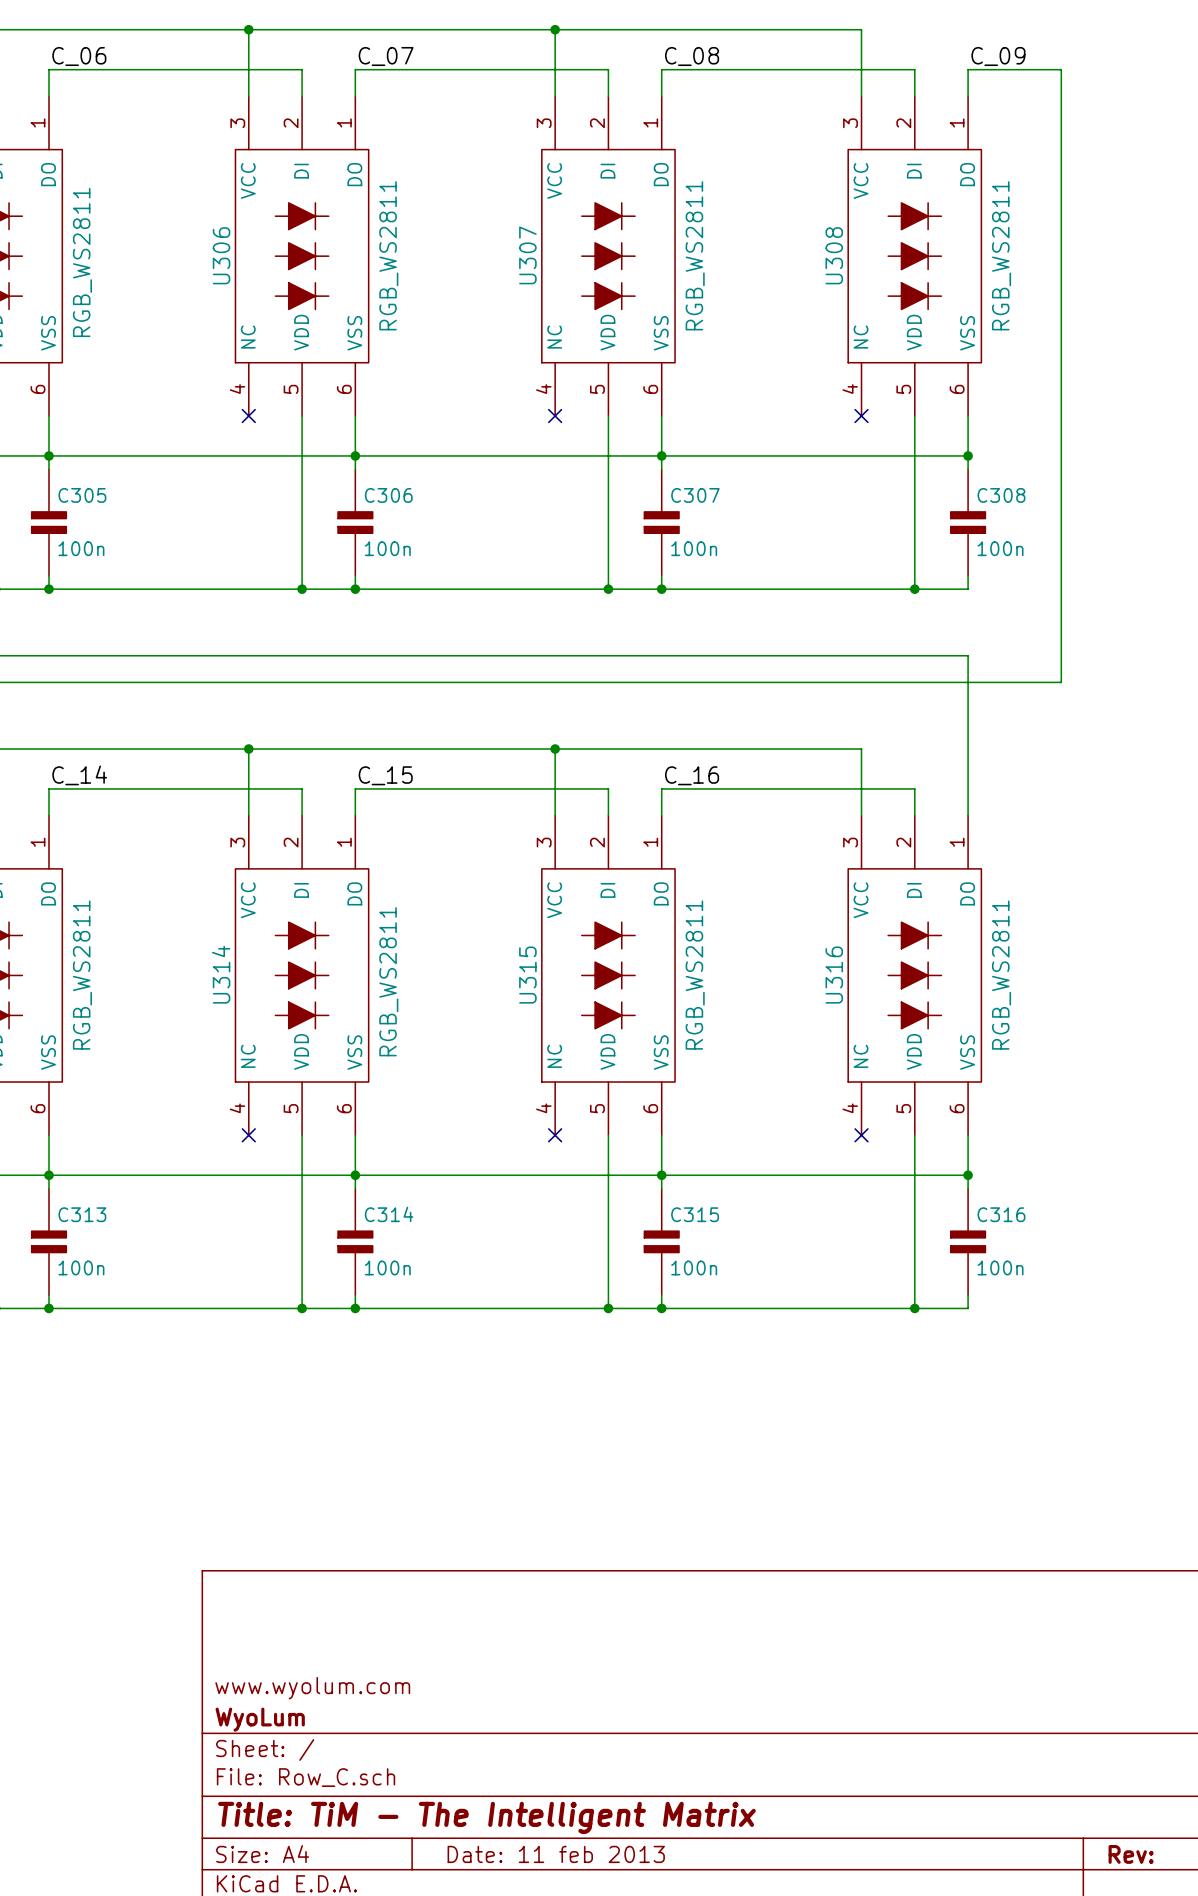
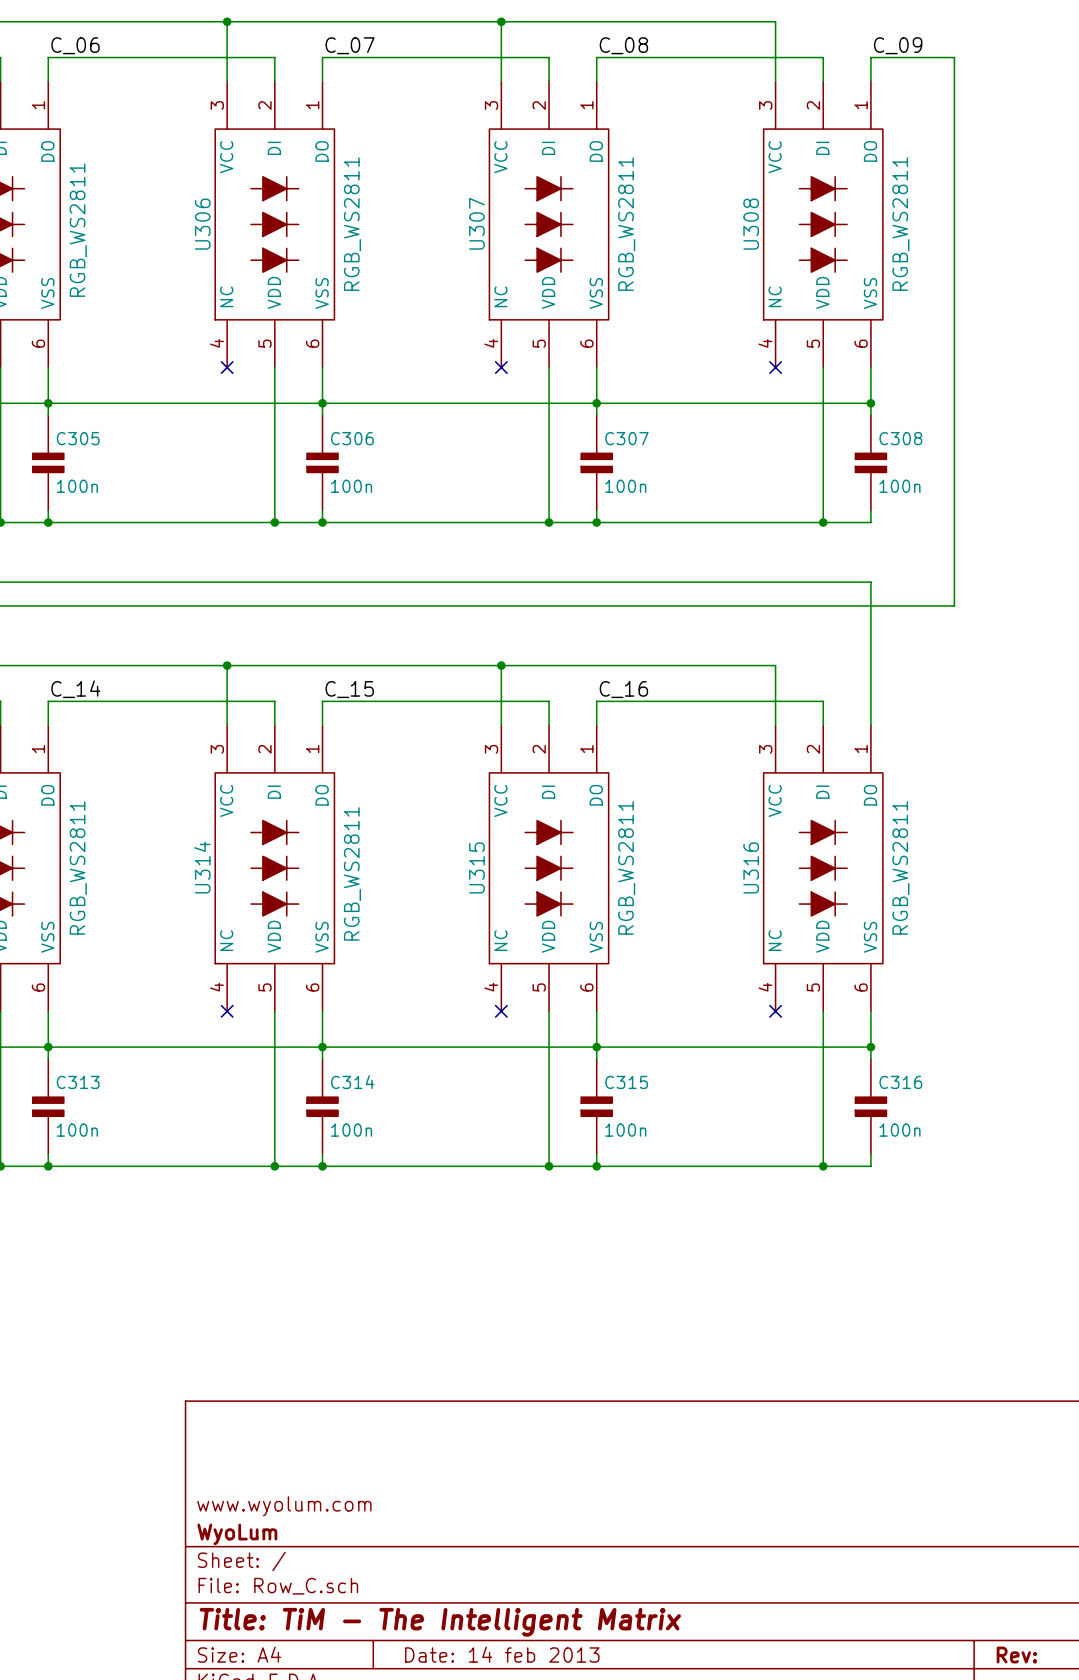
title block: Date: 11 feb 2013 (556, 1854) -> Date: 14 feb 2013 (502, 1654)

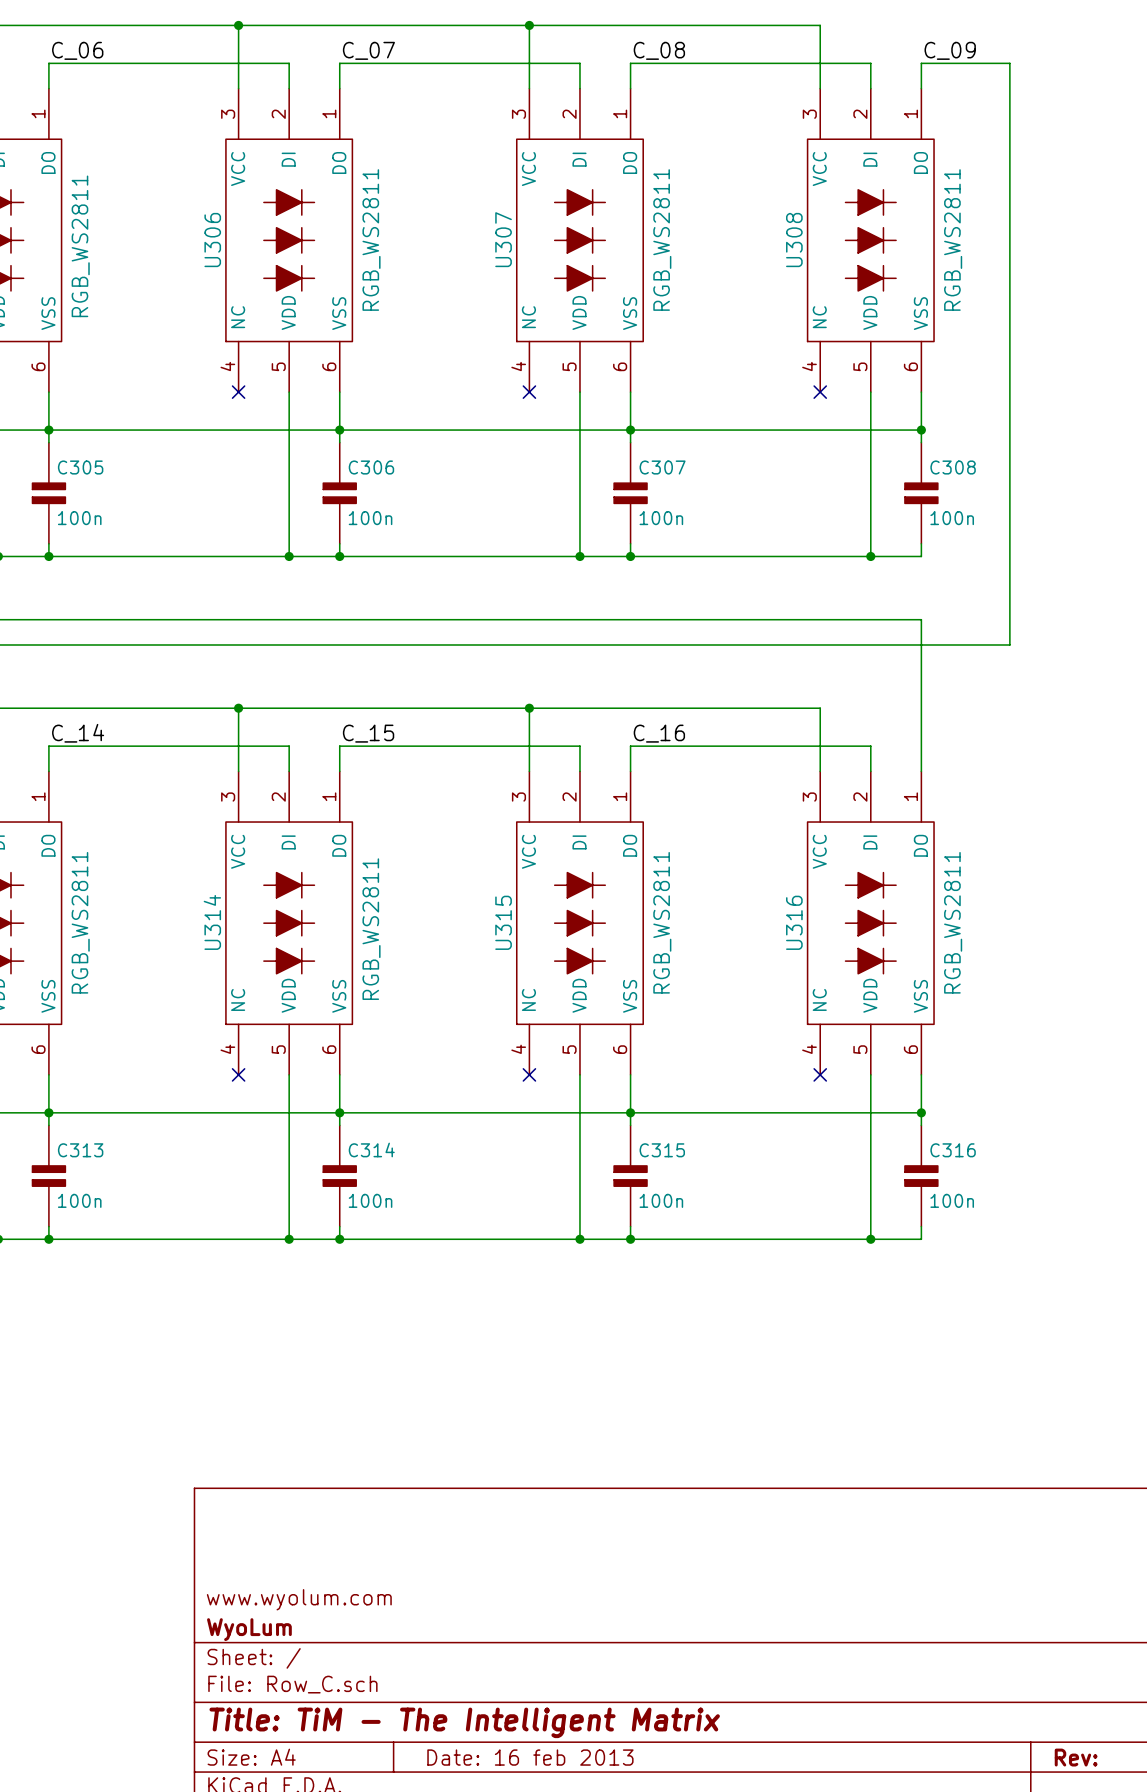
title block: Date: 14 feb 2013 (502, 1654) -> Date: 16 feb 2013 (530, 1757)

